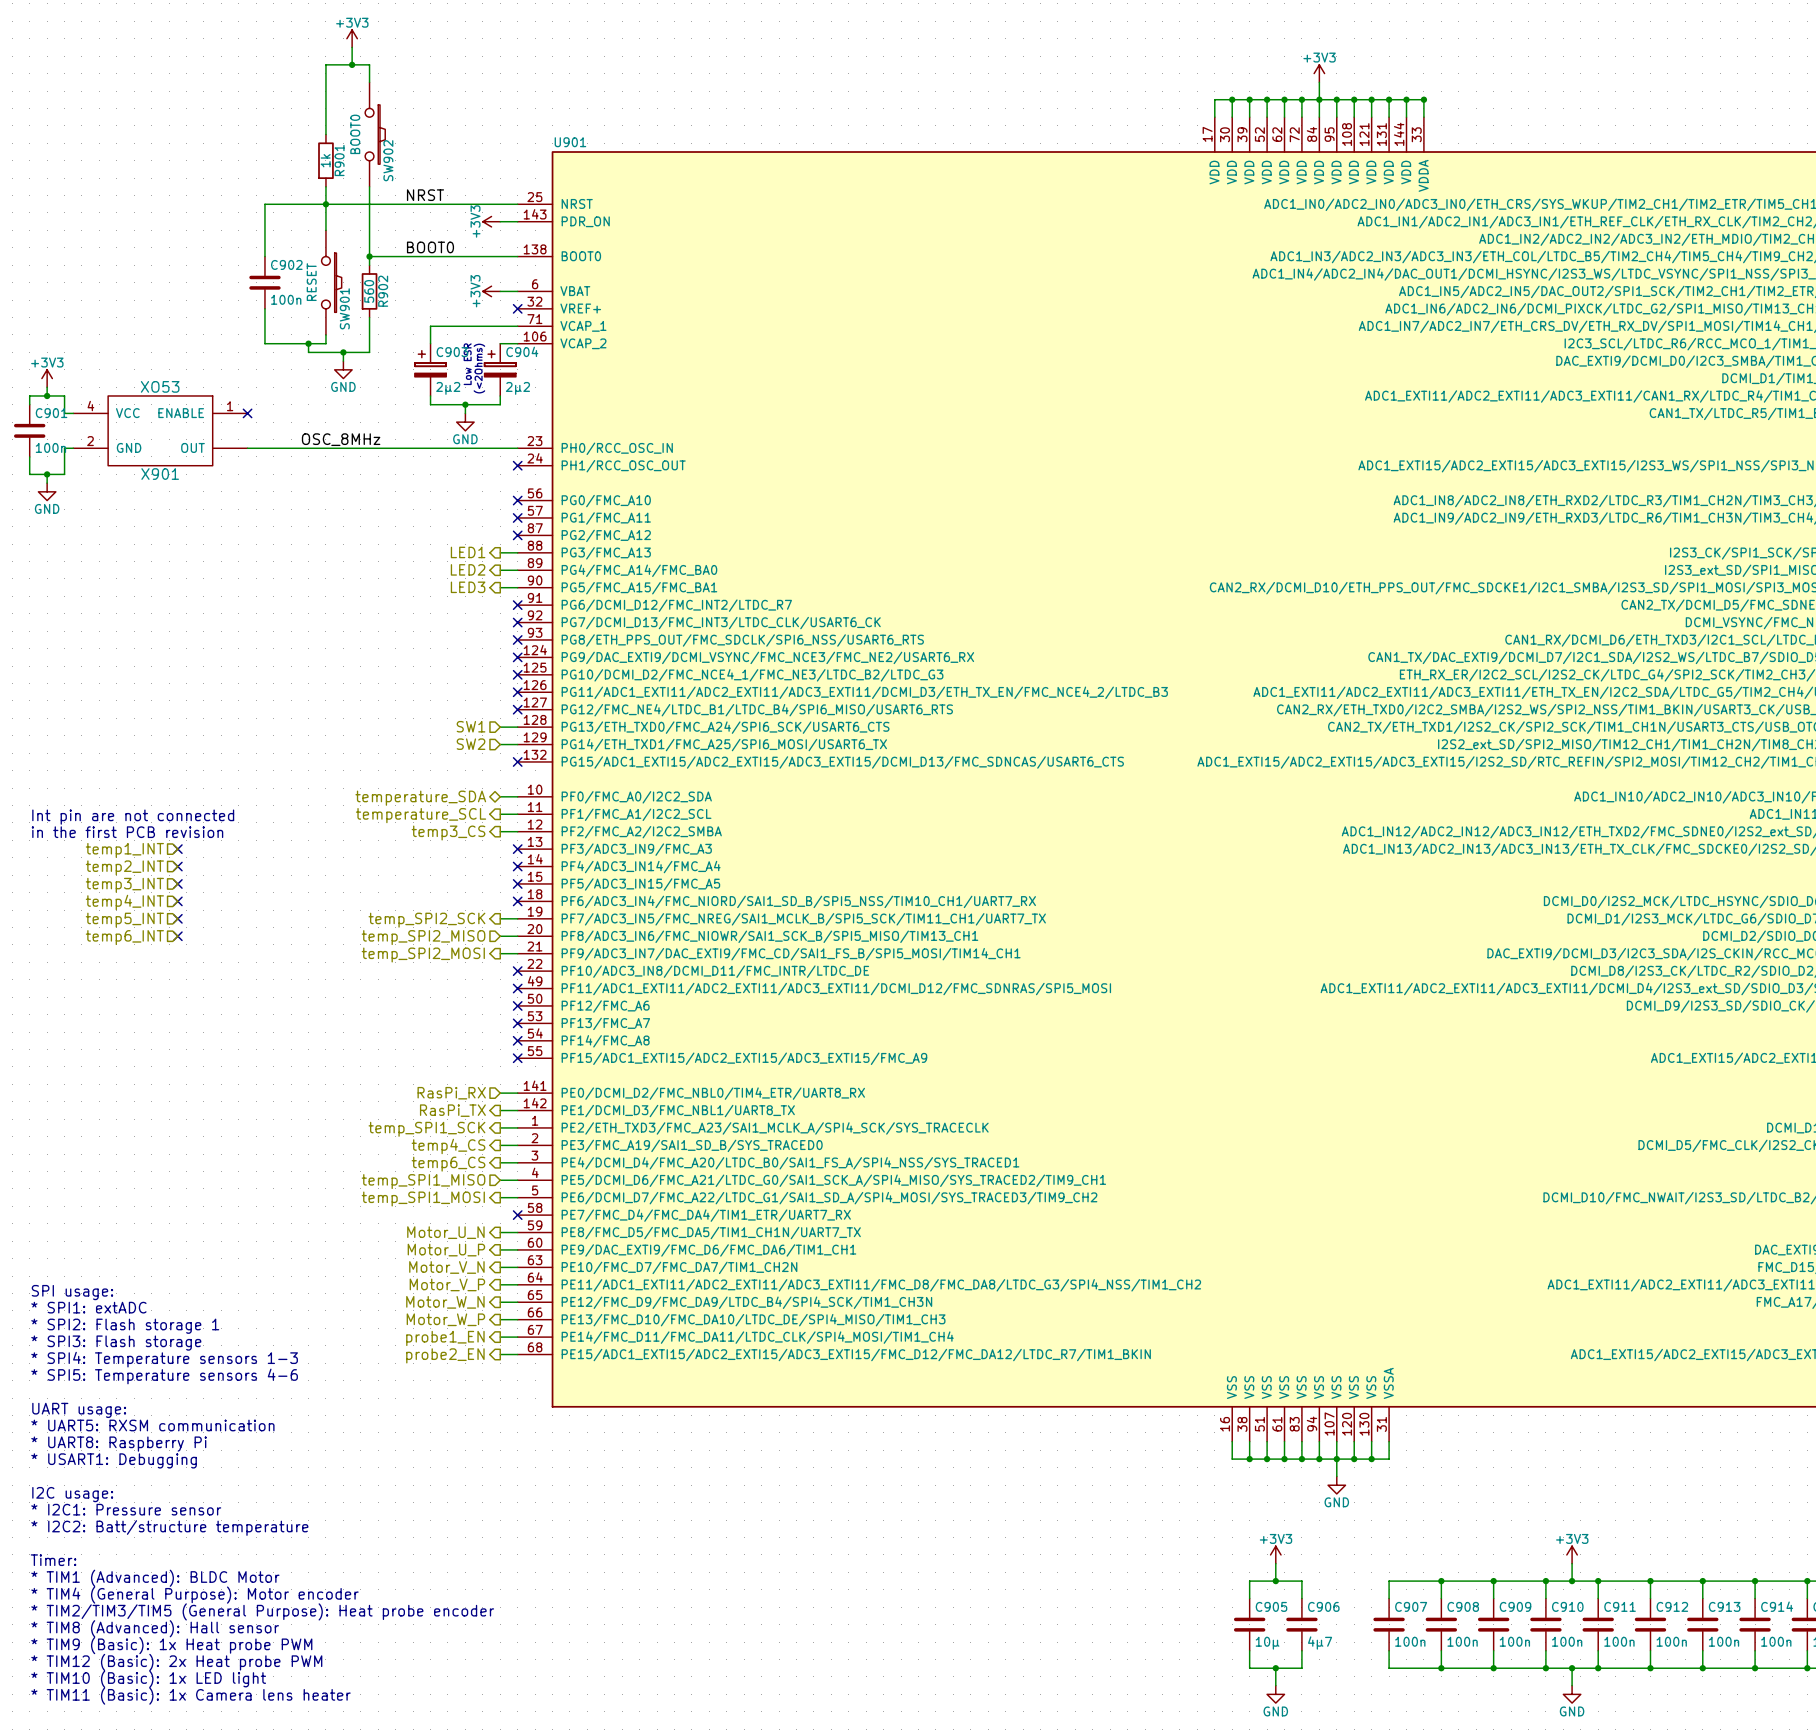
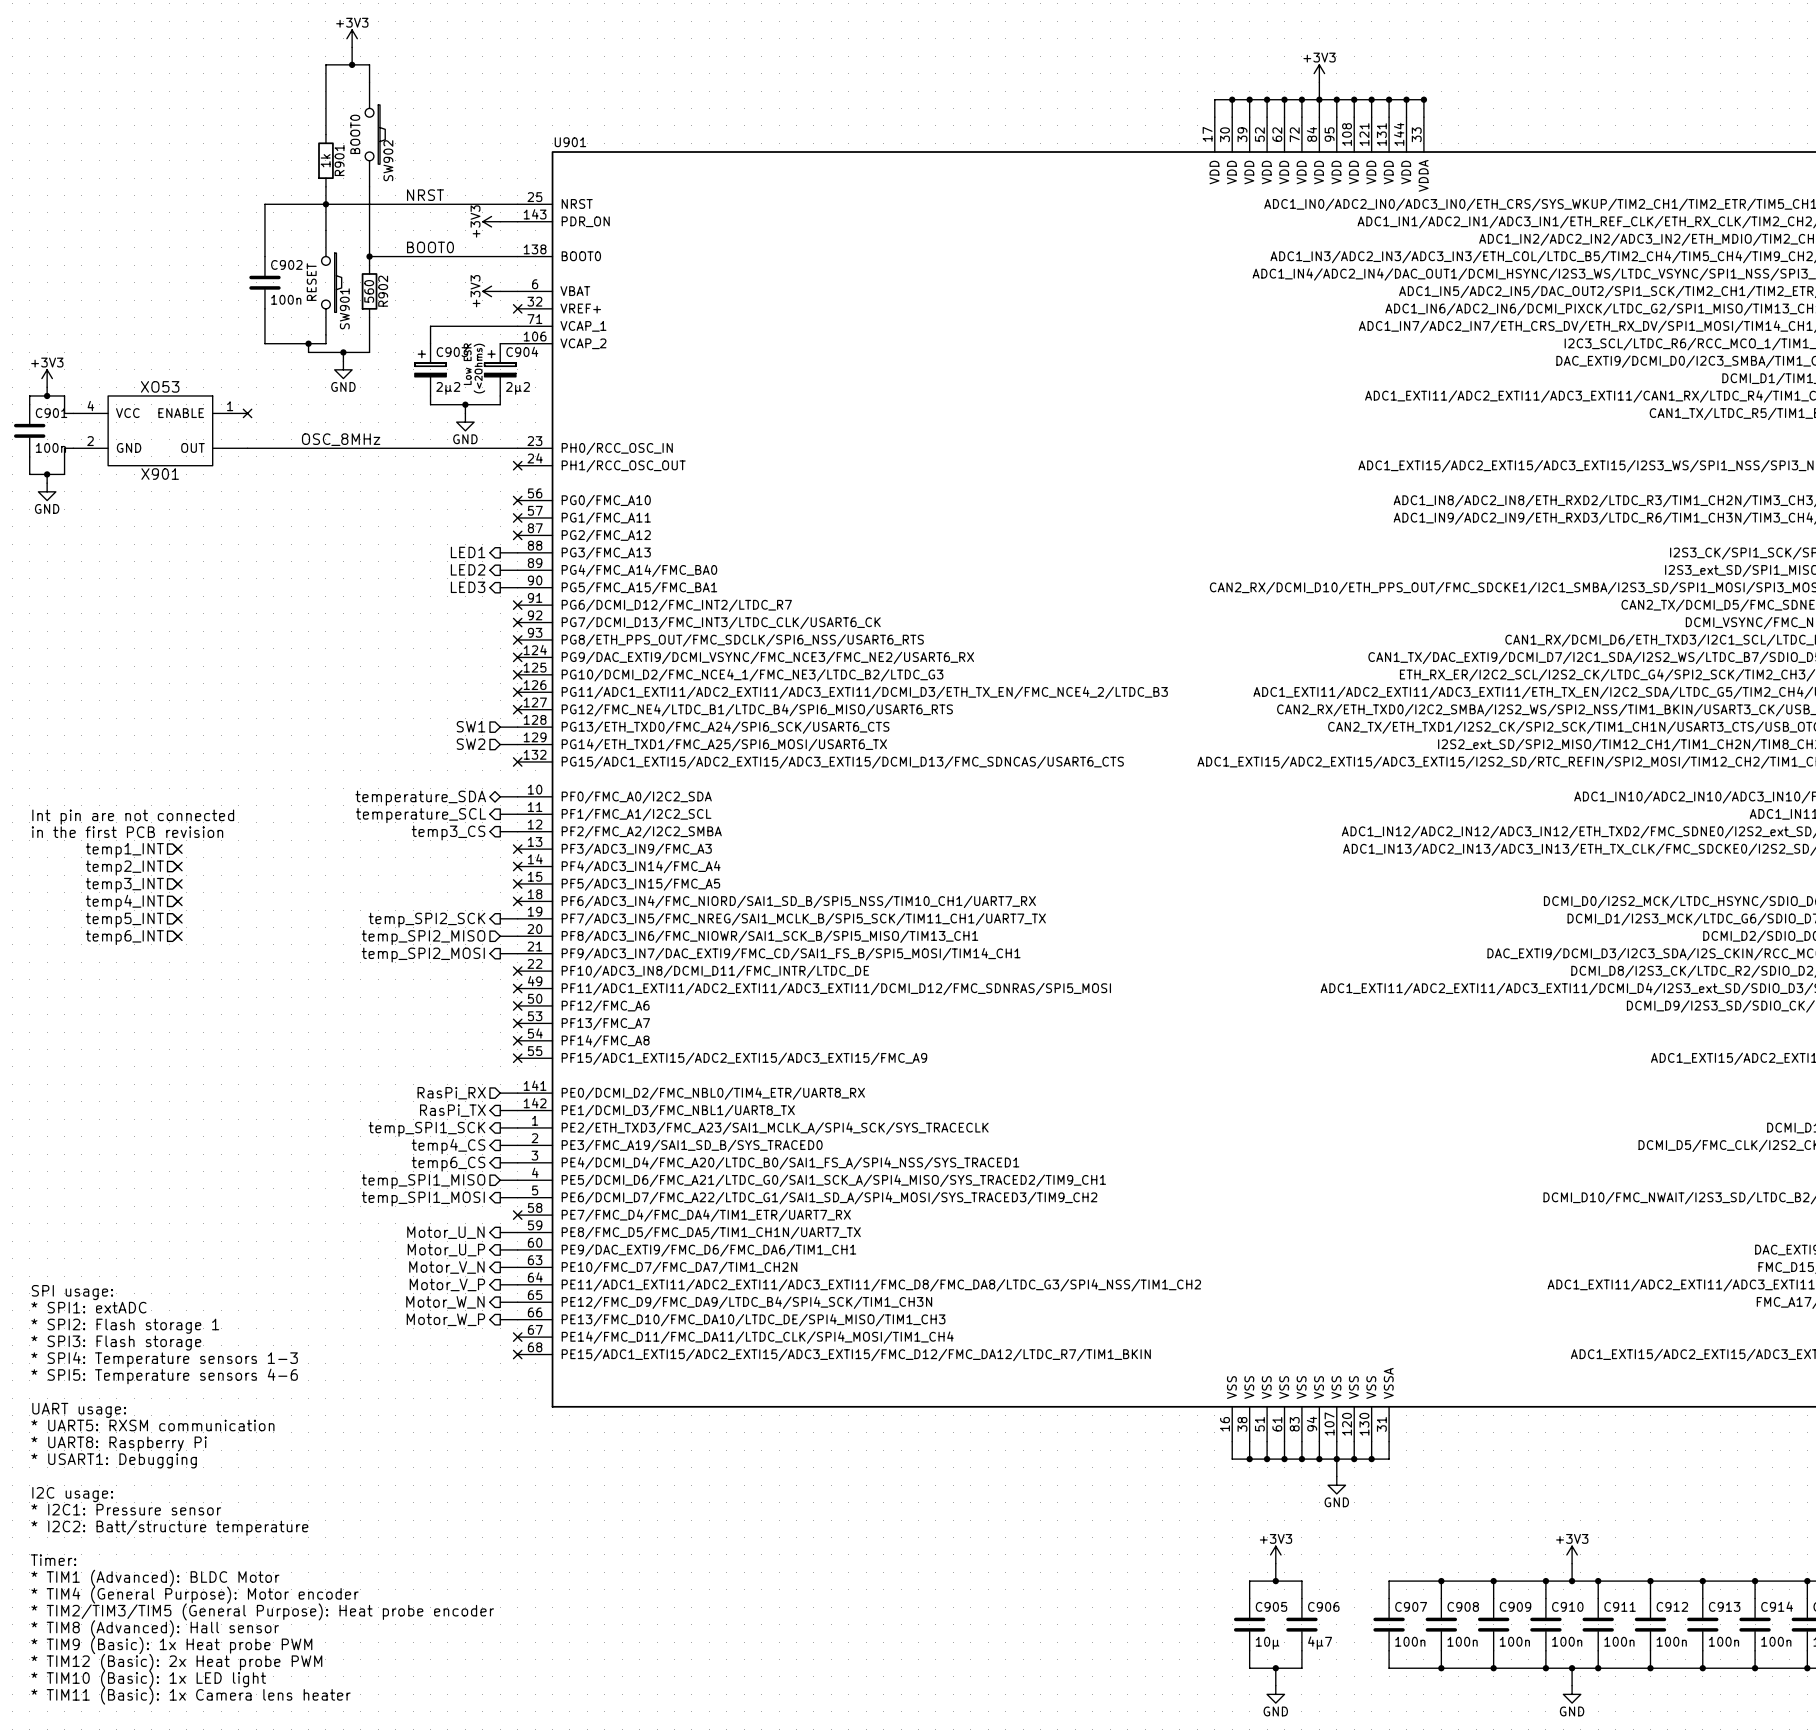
wire: (500, 1337) (517, 1337) -> none
no-connect mark: none -> (517, 1337)
hierarchical label: probe1_EN (445, 1338) -> none
wire: (500, 1354) (517, 1354) -> none
no-connect mark: none -> (517, 1354)
hierarchical label: probe2_EN (445, 1355) -> none

